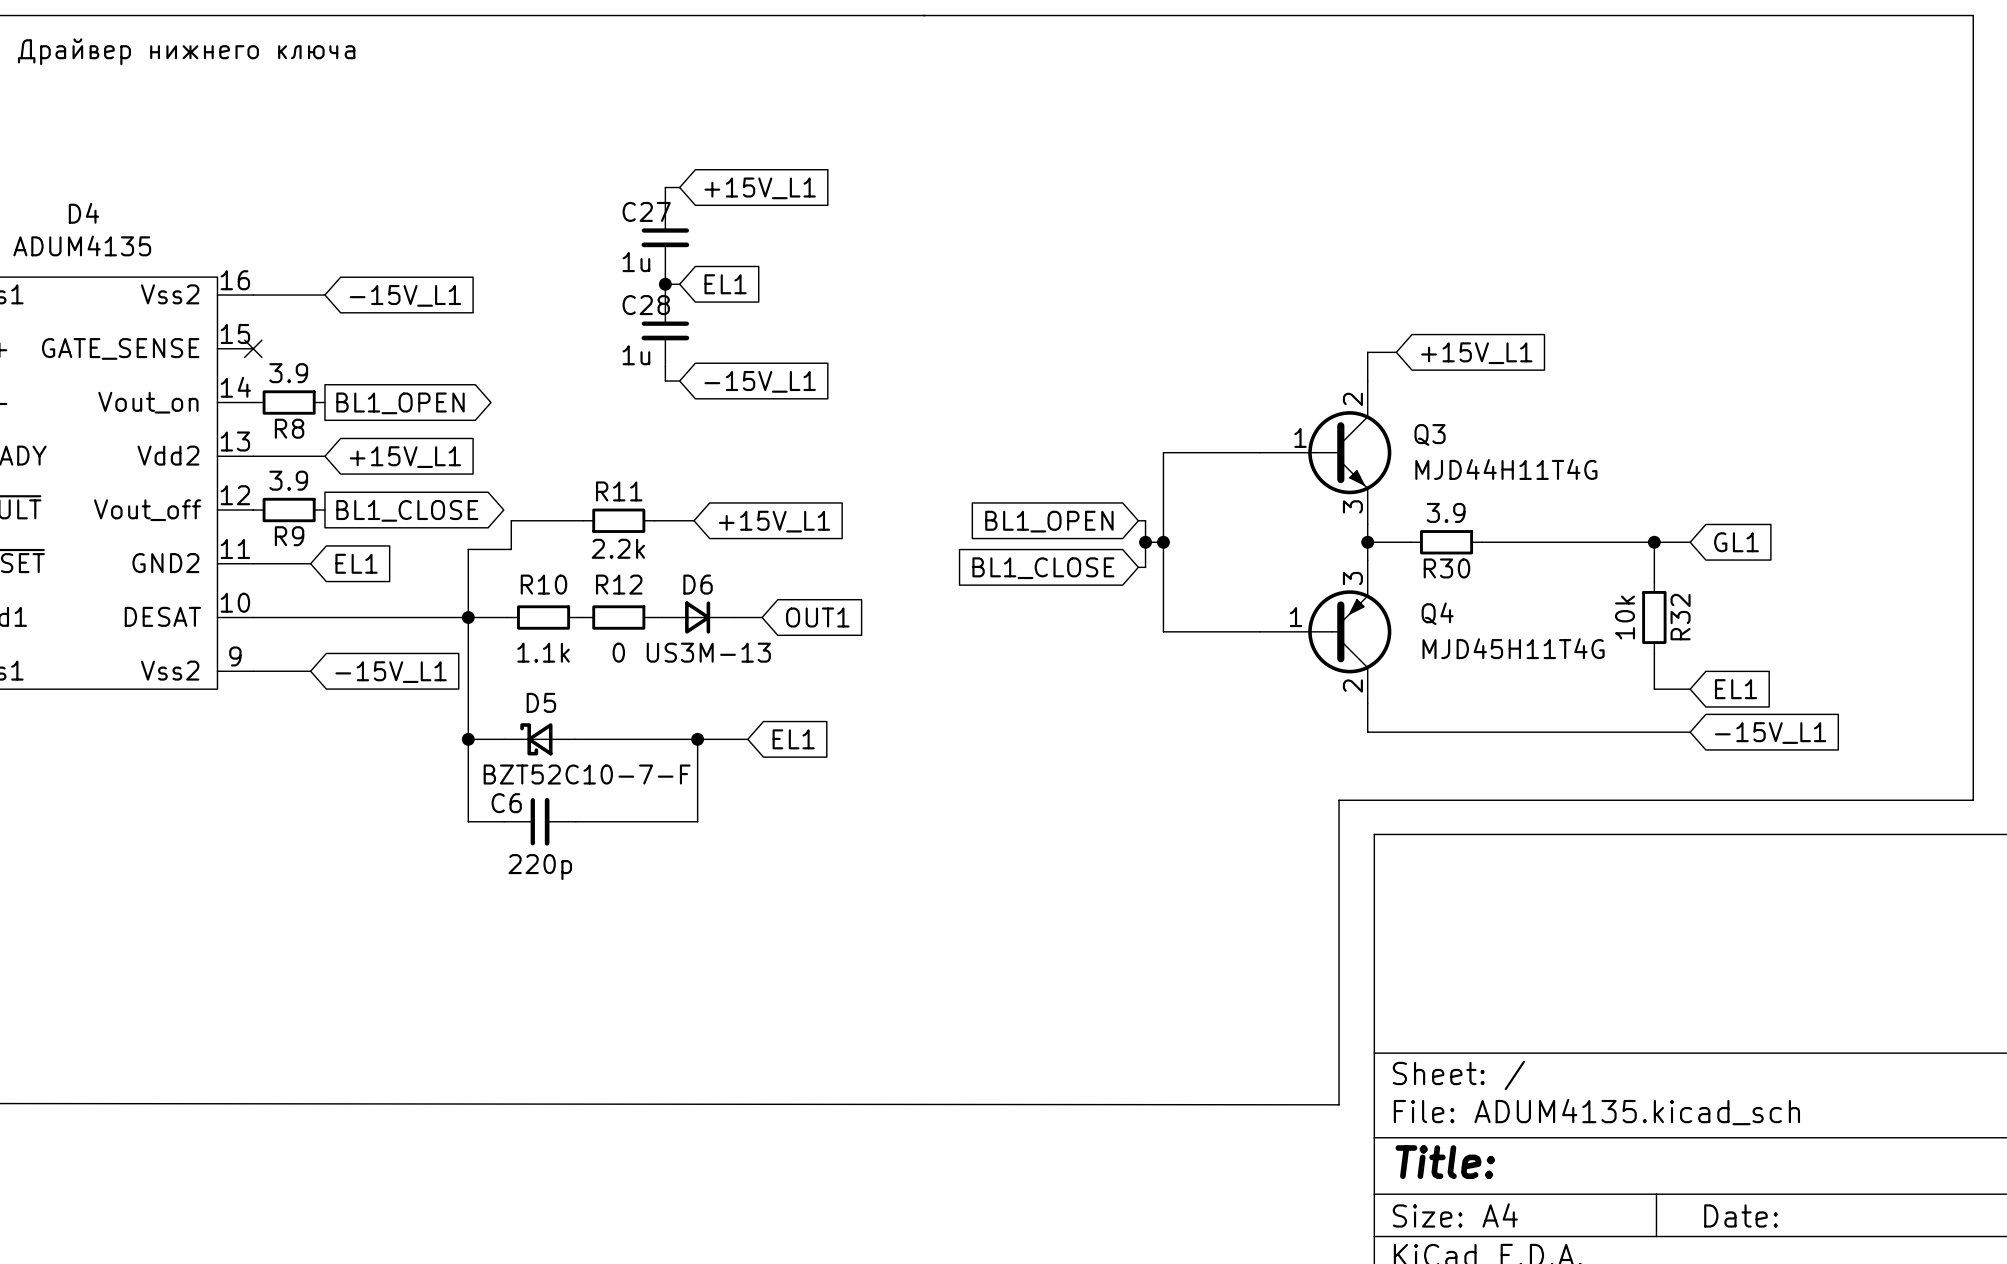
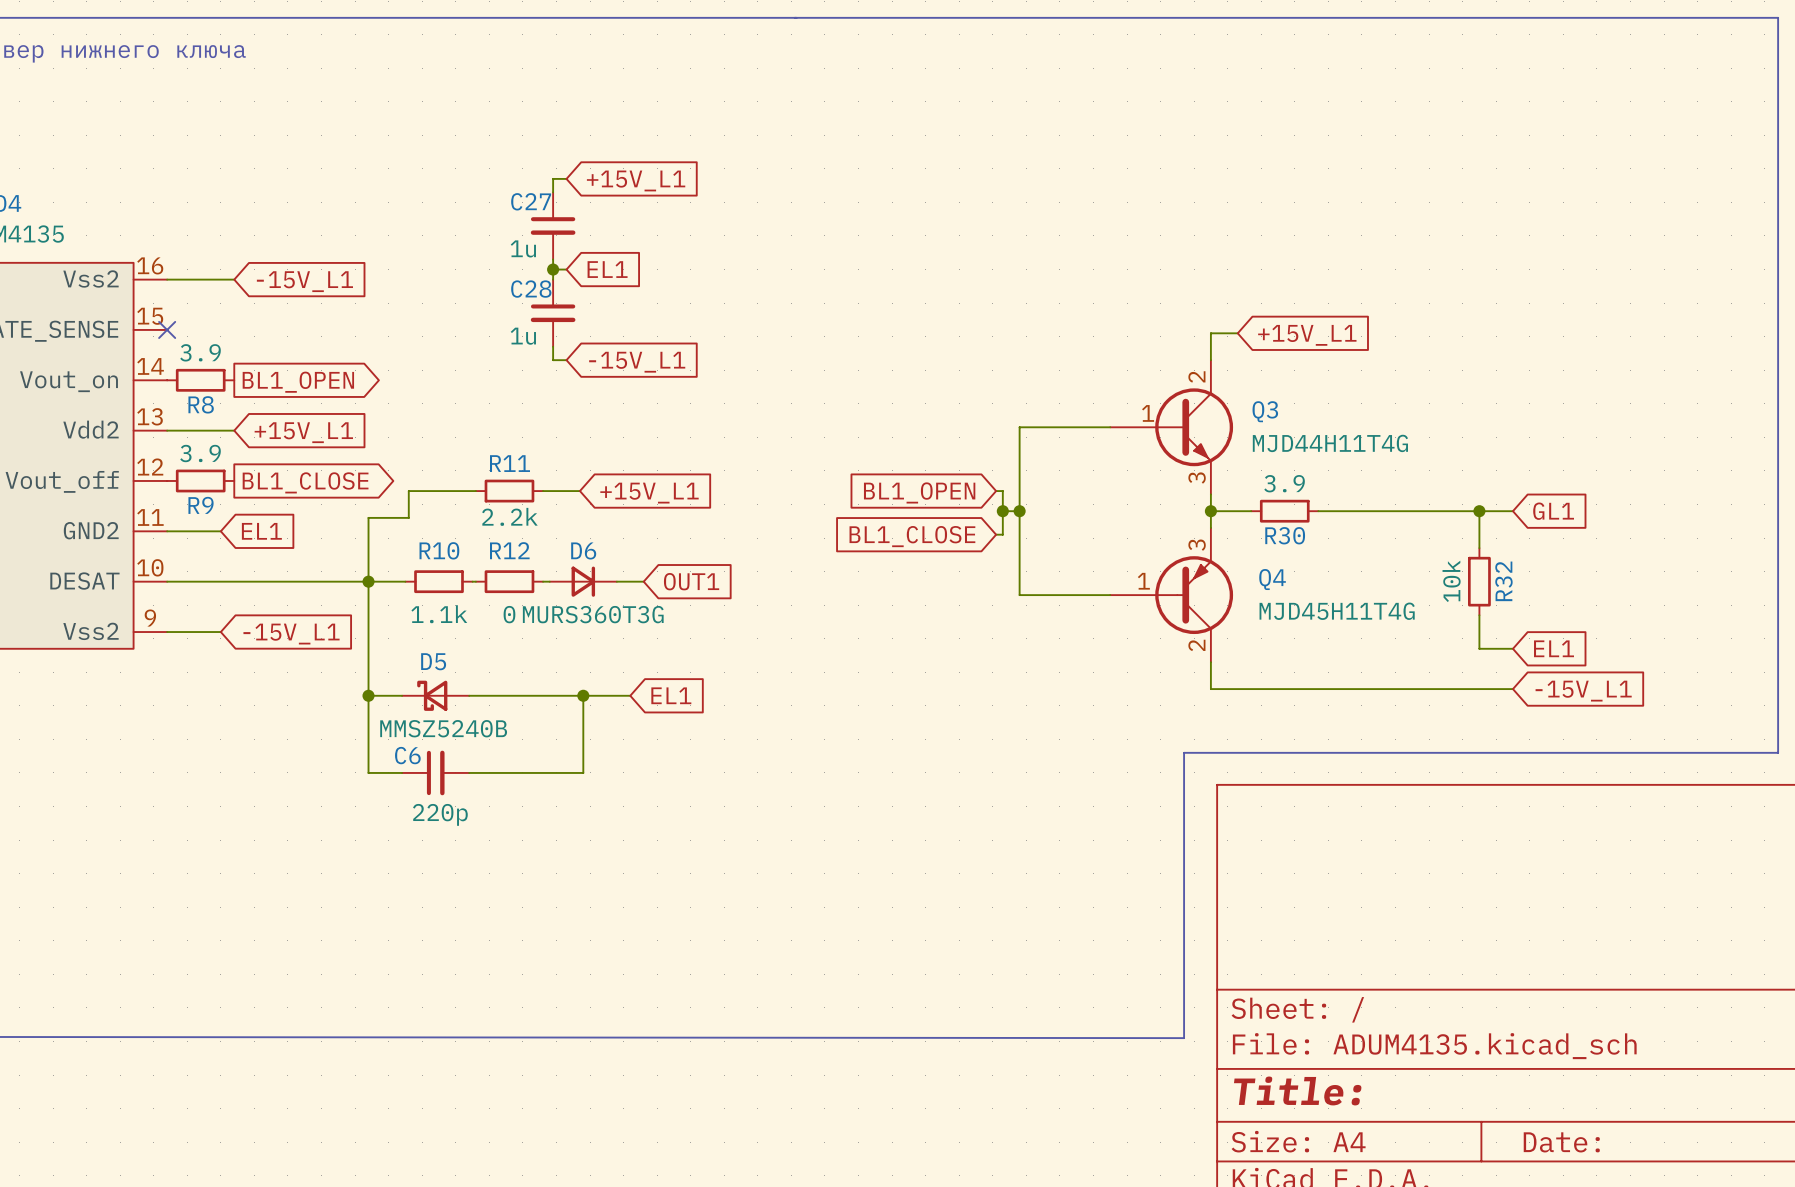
D6 value: US3M-13 (708, 652) -> MURS360T3G (593, 614)
D5 value: BZT52C10-7-F (587, 774) -> MMSZ5240B (443, 728)

